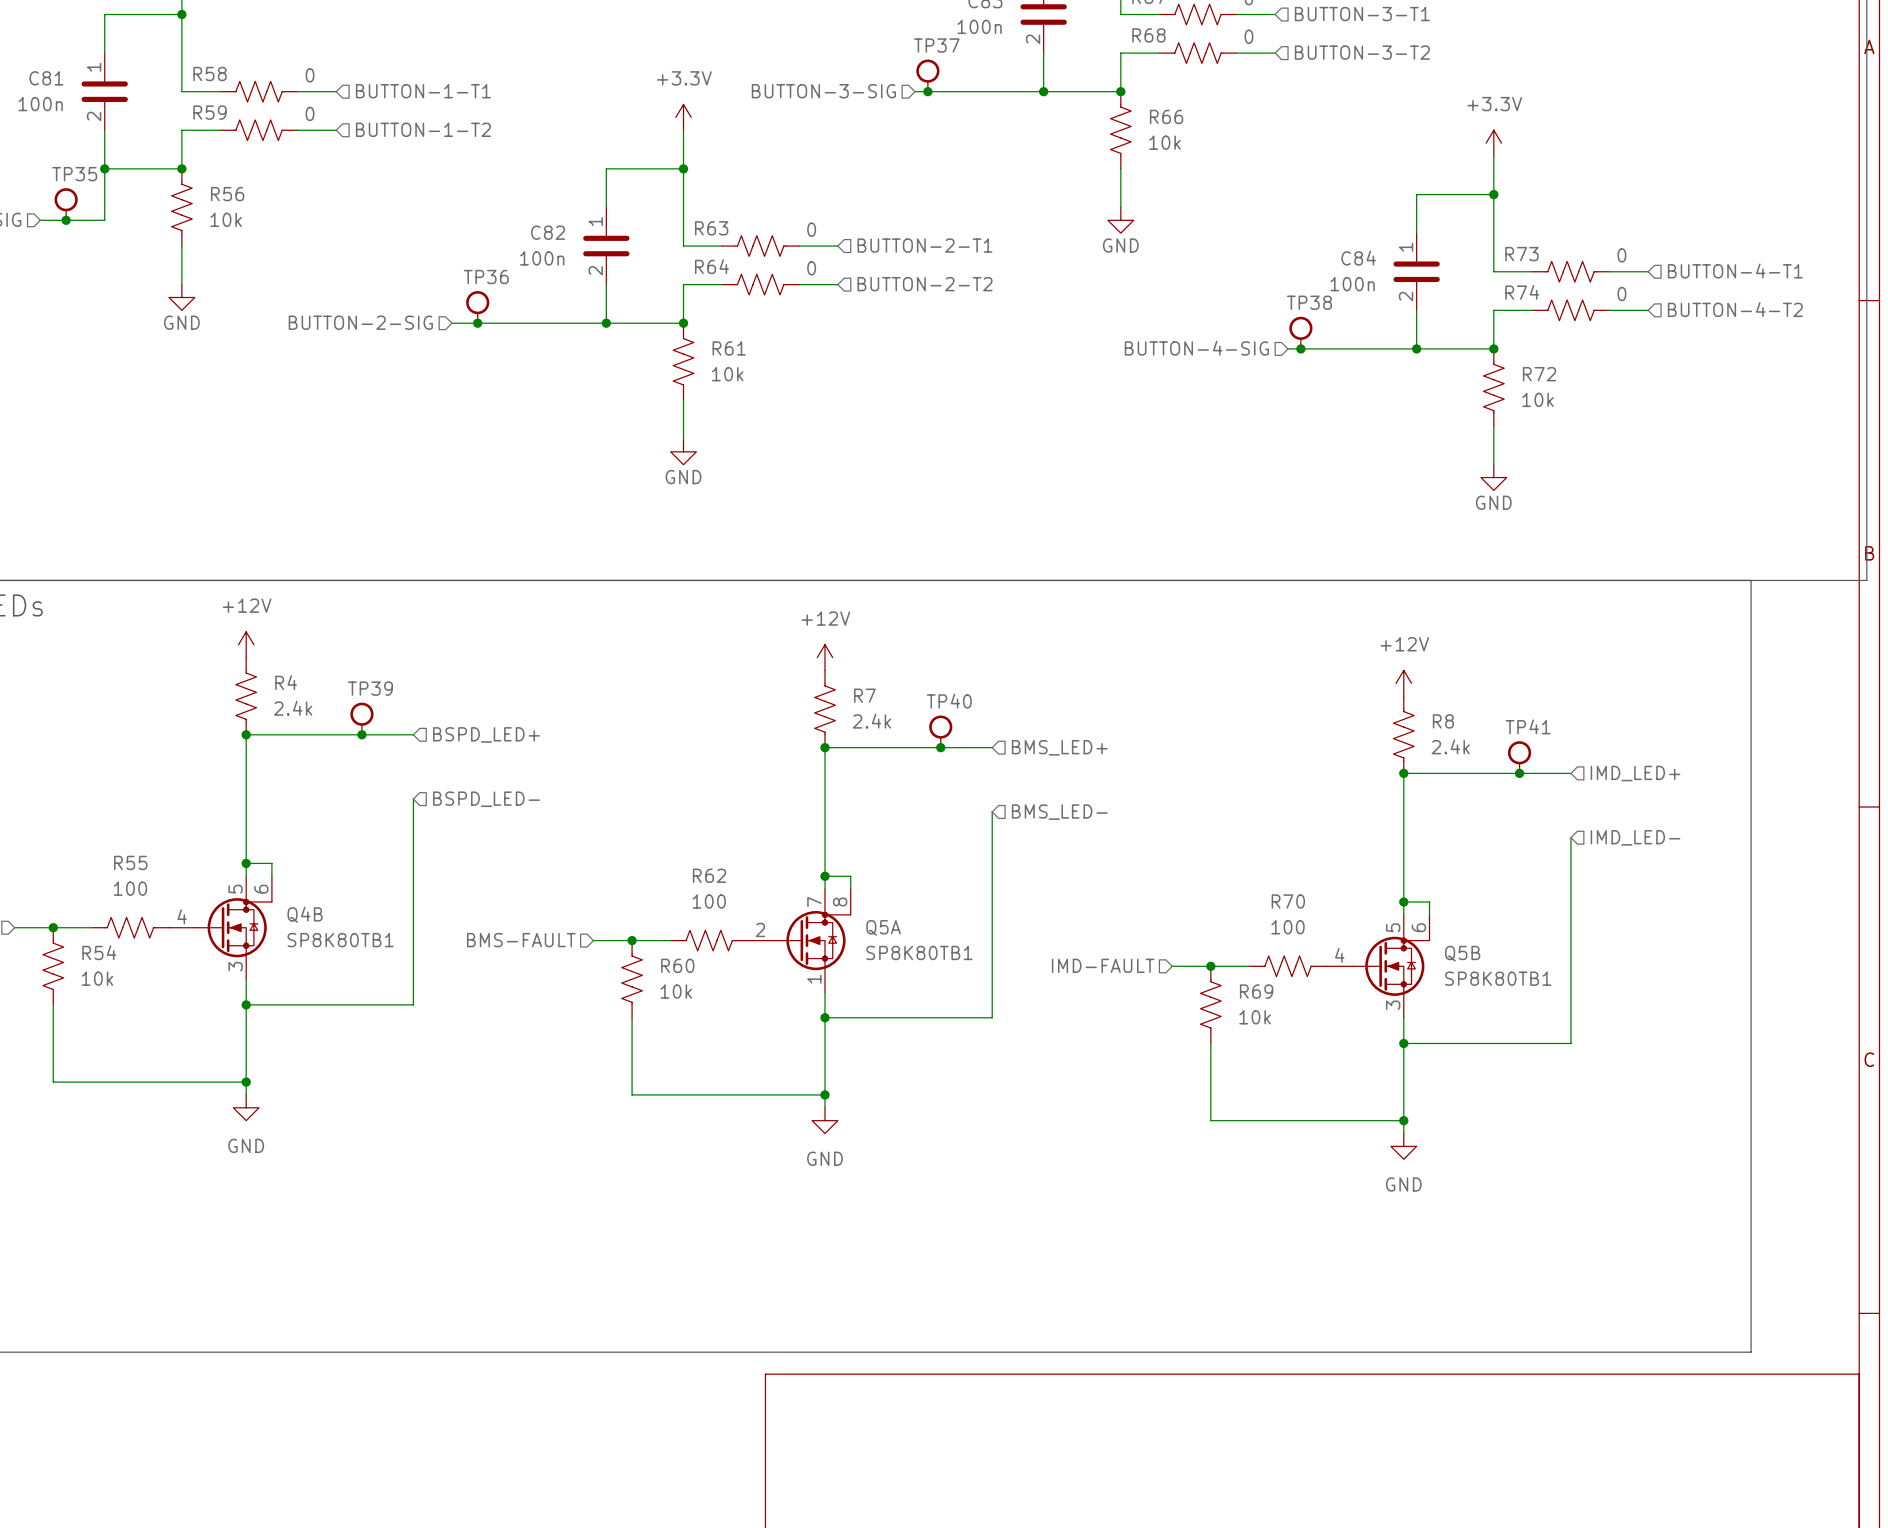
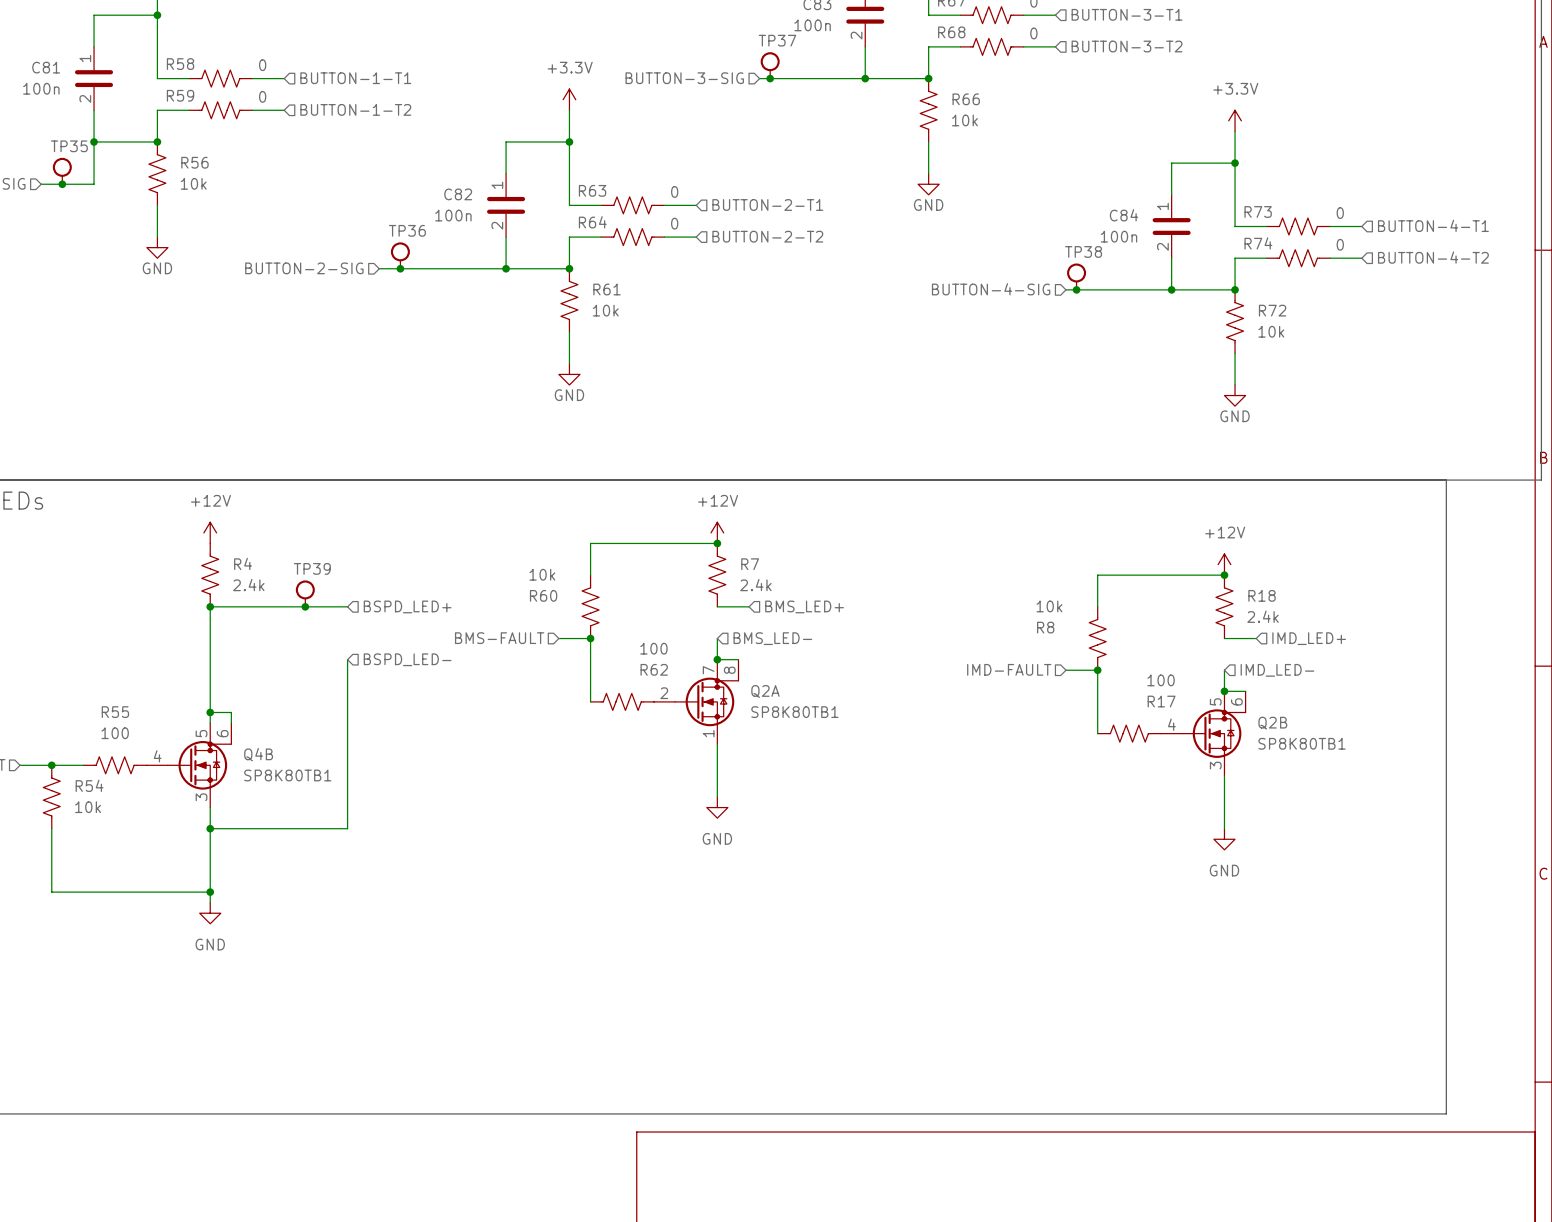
power symbol position: +12V (824, 657) -> +12V (717, 532)
wire: none -> (717, 543) (590, 543) (590, 575)
junction: none -> (717, 543)
power symbol position: +12V (1403, 683) -> +12V (1224, 564)
wire: none -> (1224, 575) (1097, 575) (1097, 606)
junction: none -> (1224, 575)
R7 position: (824, 709) -> (717, 575)
TP40: (940, 731) -> none
wire: none -> (717, 606) (749, 606)
R8 flip: as is (1403, 734) -> left-right (1097, 638)
R8 position: (1403, 734) -> (1097, 638)
R18: none -> 2.4k (1224, 606)
R8 value: 2.4k (1450, 746) -> 10k (1049, 606)
junction: (824, 747) -> none
junction: (940, 747) -> none
wire: (992, 747) (824, 747) (824, 889) -> none
hierarchical label position: BMS_LED+ (1059, 747) -> BMS_LED+ (804, 606)
TP41: (1519, 757) -> none
wire: none -> (558, 638) (590, 638) (590, 701)
junction: none -> (590, 638)
wire: none -> (717, 638) (717, 659) (738, 659)
junction: (1403, 773) -> none
wire: (1480, 773) (1403, 773) (1403, 914) -> none
wire: (1519, 773) (1571, 773) -> none
junction: (1519, 773) -> none
hierarchical label position: IMD_LED+ (1635, 773) -> IMD_LED+ (1309, 638)
junction: none -> (717, 659)
wire: (992, 811) (992, 1017) (824, 1017) -> none
wire: none -> (1065, 670) (1097, 670) (1097, 733)
junction: none -> (1097, 670)
wire: none -> (1224, 670) (1224, 691) (1245, 691)
hierarchical label position: BMS_LED- (1059, 812) -> BMS_LED- (772, 638)
junction: none -> (1224, 691)
wire: (1571, 837) (1571, 1043) (1403, 1043) -> none
hierarchical label position: IMD_LED- (1635, 837) -> IMD_LED- (1277, 670)
Q2A: none -> SP8K80TB1 (696, 701)
R62 name position: R62 (709, 875) -> R62 (654, 669)
wire: (824, 876) (850, 876) (850, 889) -> none
junction: (824, 876) -> none
R17: none -> 100 (1129, 733)
Q2B: none -> SP8K80TB1 (1203, 733)
R62 value position: 100 (709, 901) -> 100 (653, 648)
wire: none -> (717, 744) (717, 797)
wire: (1403, 902) (1429, 902) (1429, 914) -> none
junction: (1403, 902) -> none
hierarchical label position: BMS-FAULT (521, 940) -> BMS-FAULT (499, 638)
wire: (593, 940) (670, 940) -> none
junction: (632, 940) -> none
R62 position: (709, 940) -> (622, 701)
Q5A: SP8K80TB1 (799, 940) -> none
wire: none -> (1224, 775) (1224, 828)
hierarchical label position: IMD-FAULT (1103, 965) -> IMD-FAULT (1009, 669)
wire: (1172, 966) (1249, 966) -> none
junction: (1210, 966) -> none
R70: 100 (1288, 966) -> none
Q5B: SP8K80TB1 (1378, 966) -> none
R60 flip: as is (632, 979) -> left-right (590, 606)
R60 position: (632, 979) -> (590, 606)
R60 value position: 10k (676, 991) -> 10k (542, 574)
wire: (824, 992) (824, 1107) -> none
R69: 10k (1210, 1004) -> none
wire: (632, 1017) (632, 1094) (824, 1094) -> none
junction: (824, 1017) -> none
wire: (1403, 1017) (1403, 1133) -> none
wire: (1210, 1043) (1210, 1120) (1403, 1120) -> none
junction: (1403, 1043) -> none
junction: (824, 1094) -> none
power symbol position: GND (824, 1120) -> GND (717, 807)
junction: (1403, 1120) -> none
power symbol position: GND (1403, 1146) -> GND (1224, 839)

